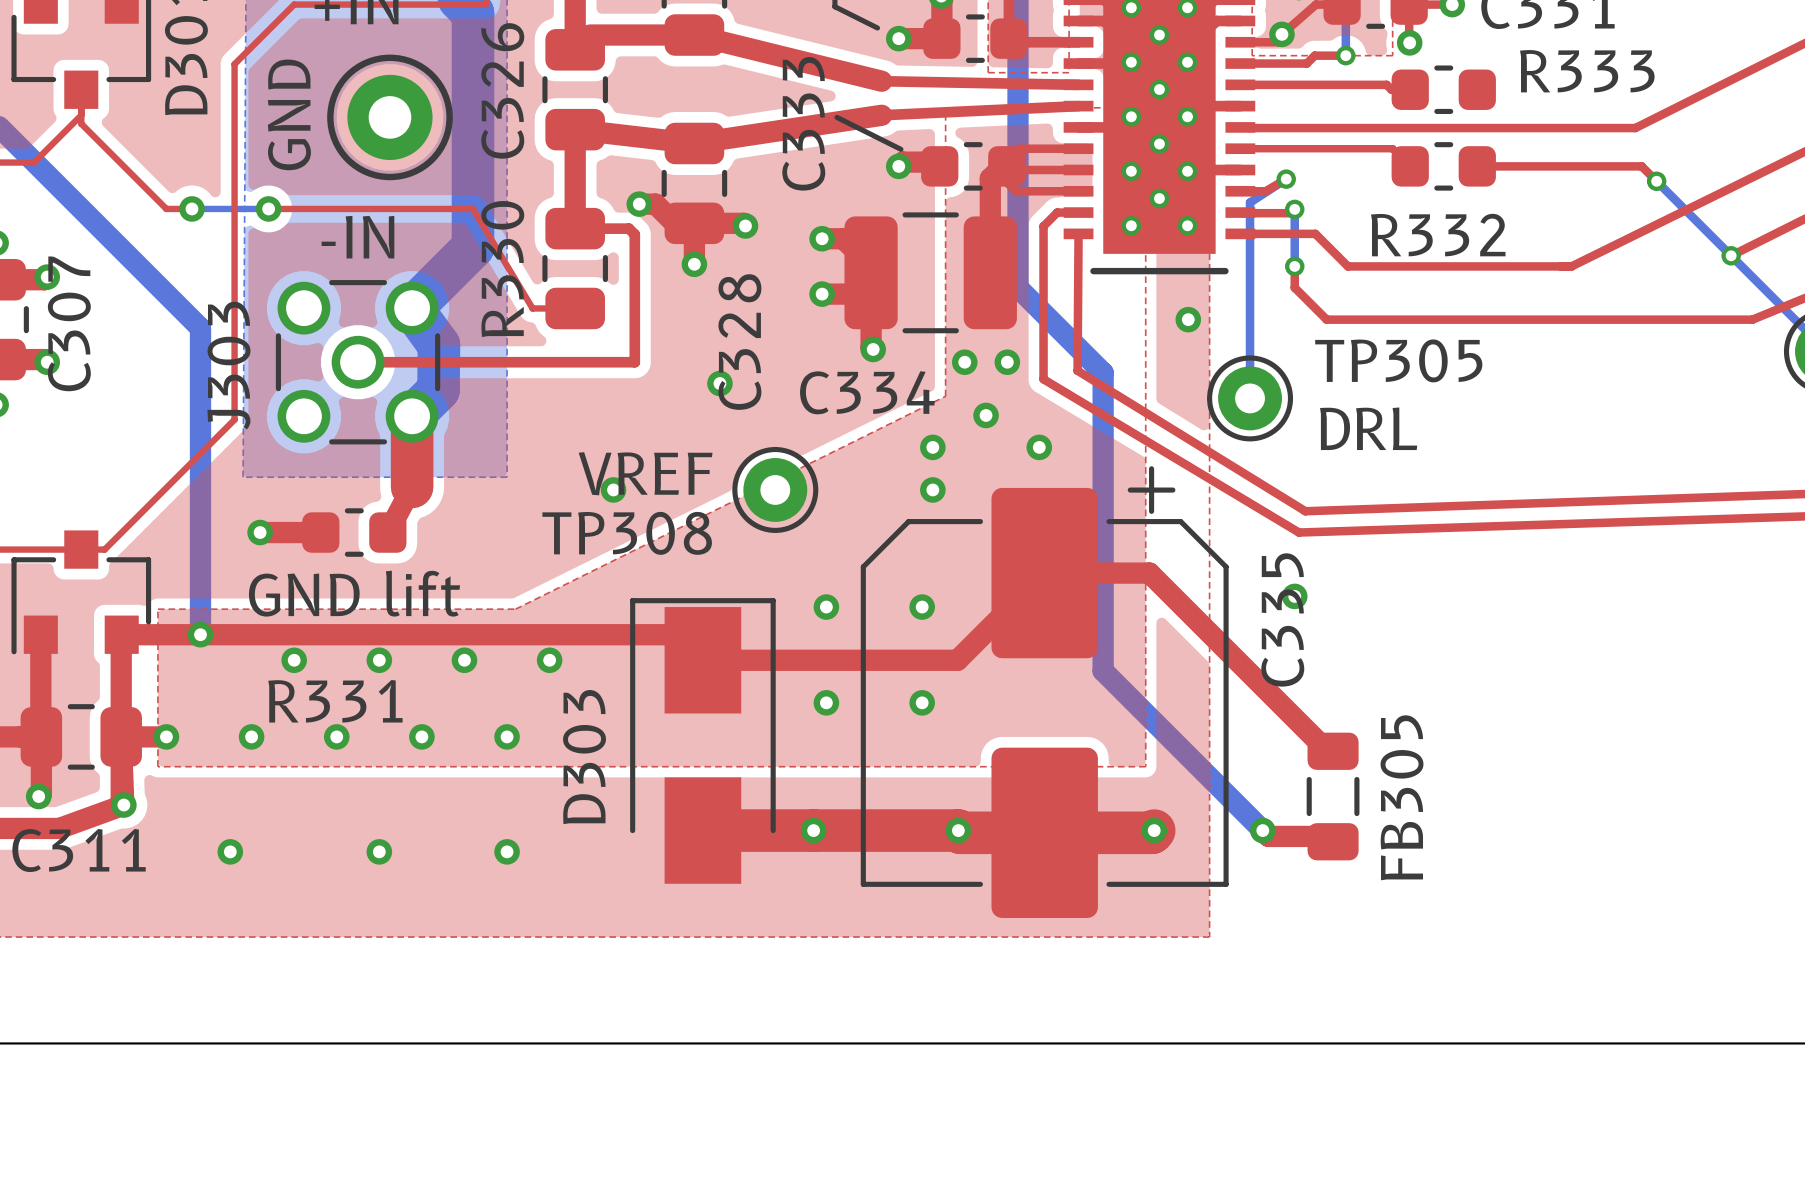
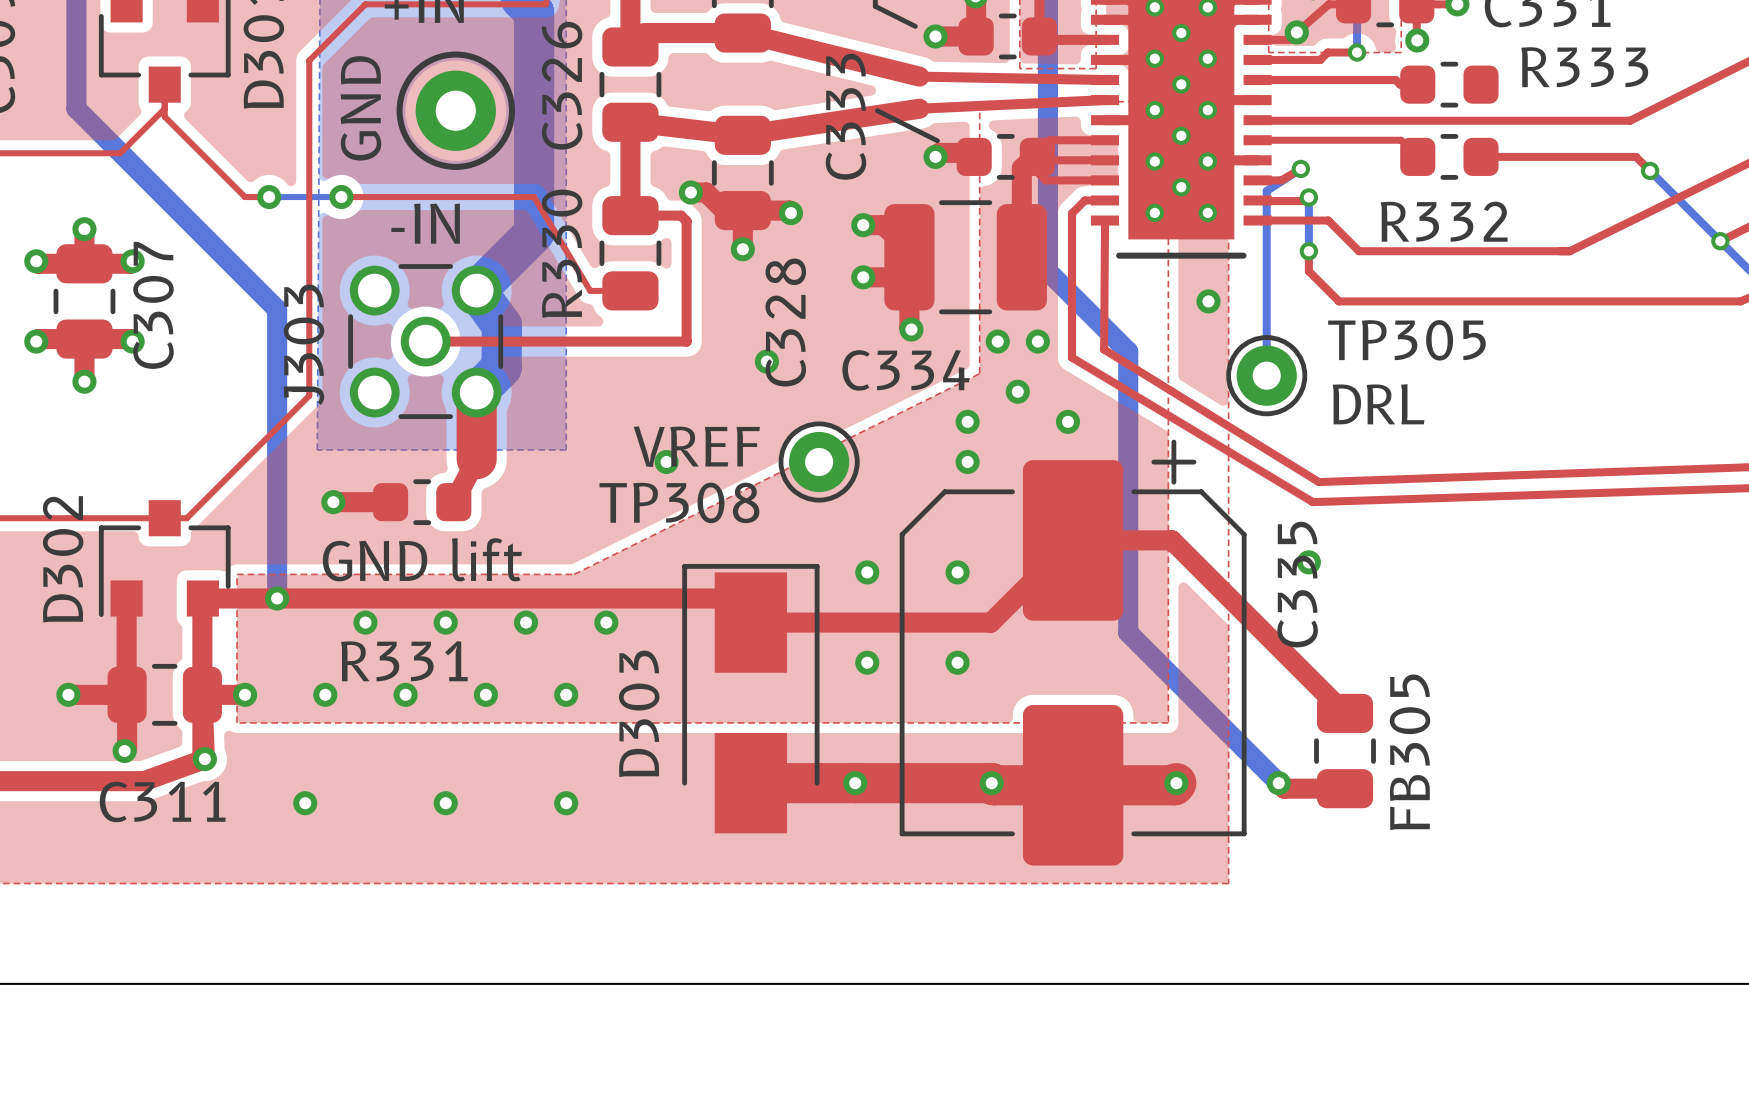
FB305 footprint: [1306, 732, 1360, 861] -> [1314, 693, 1376, 809]

